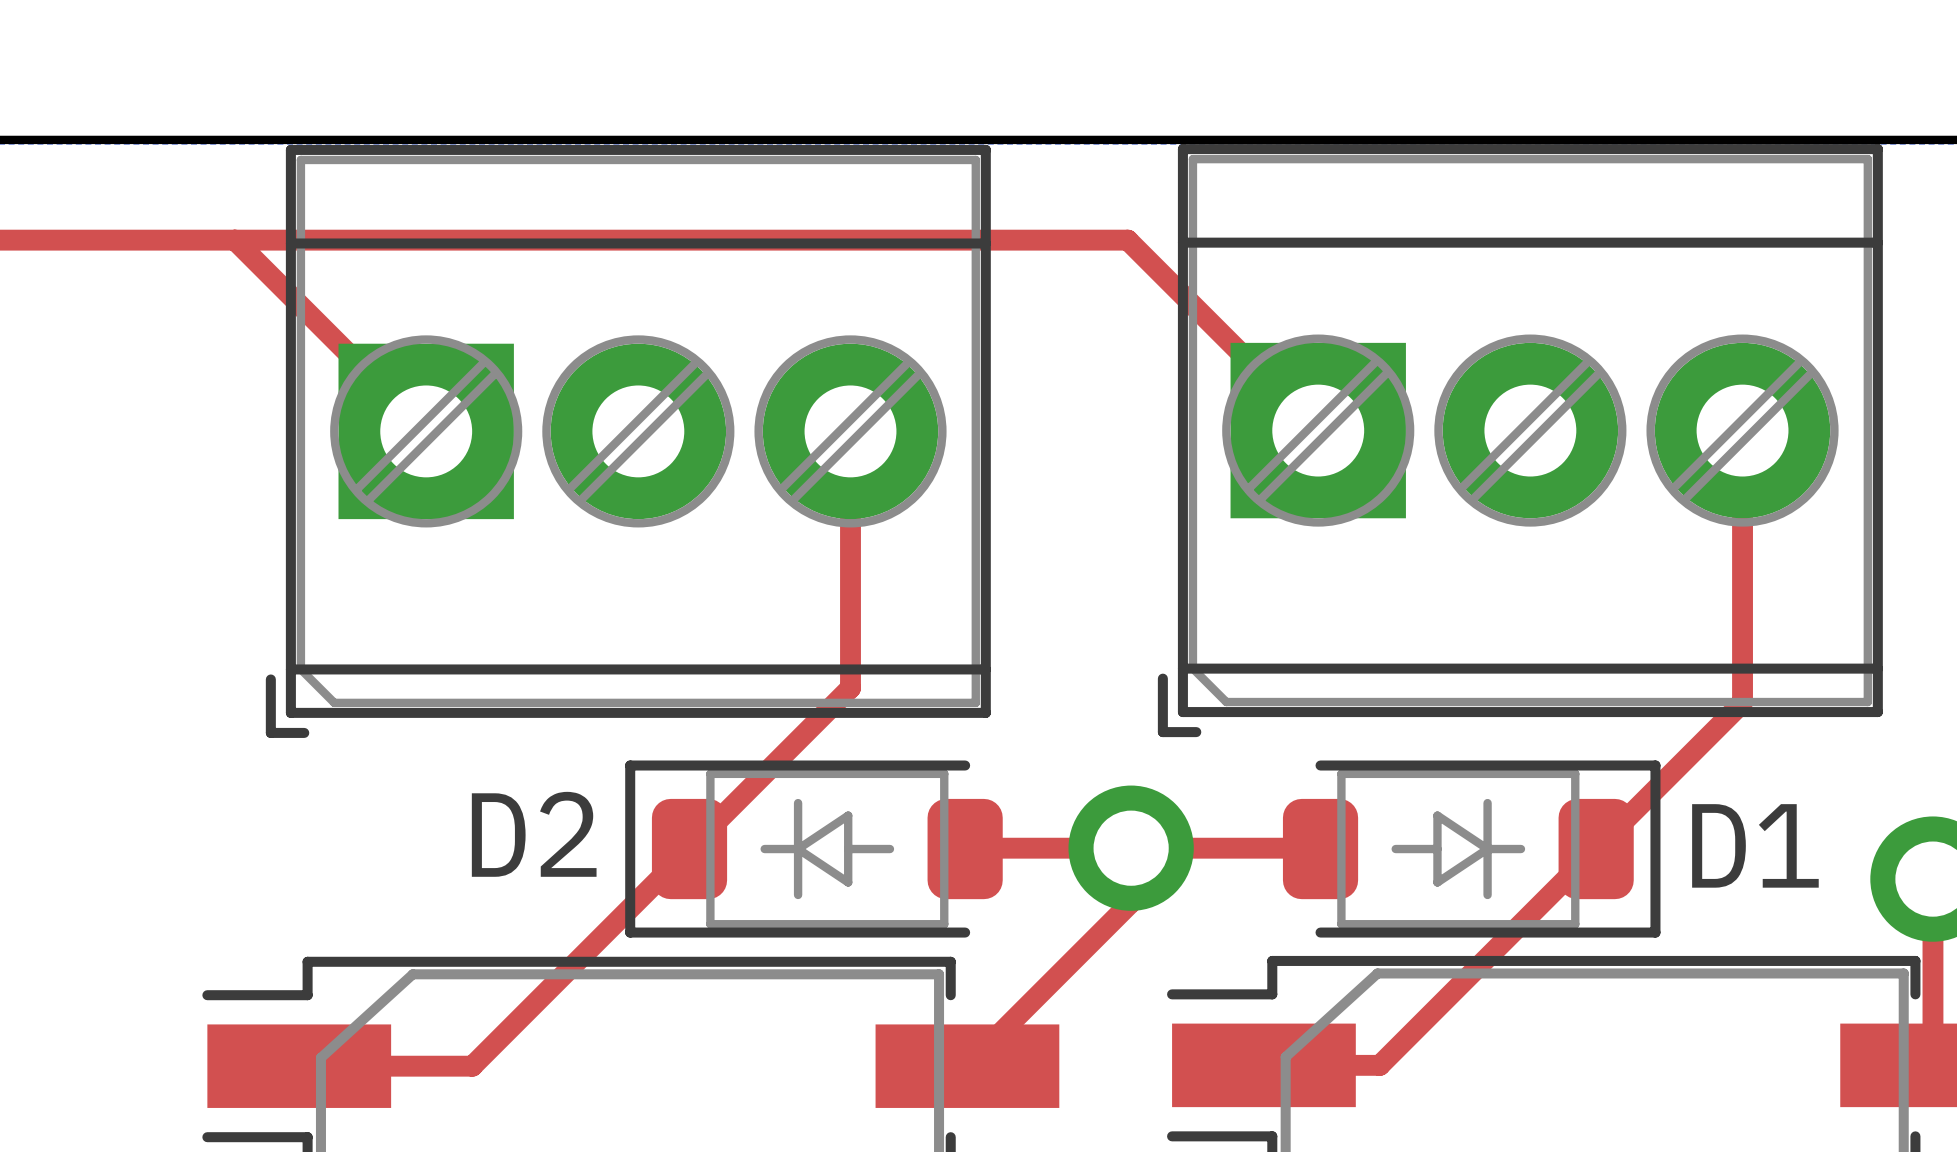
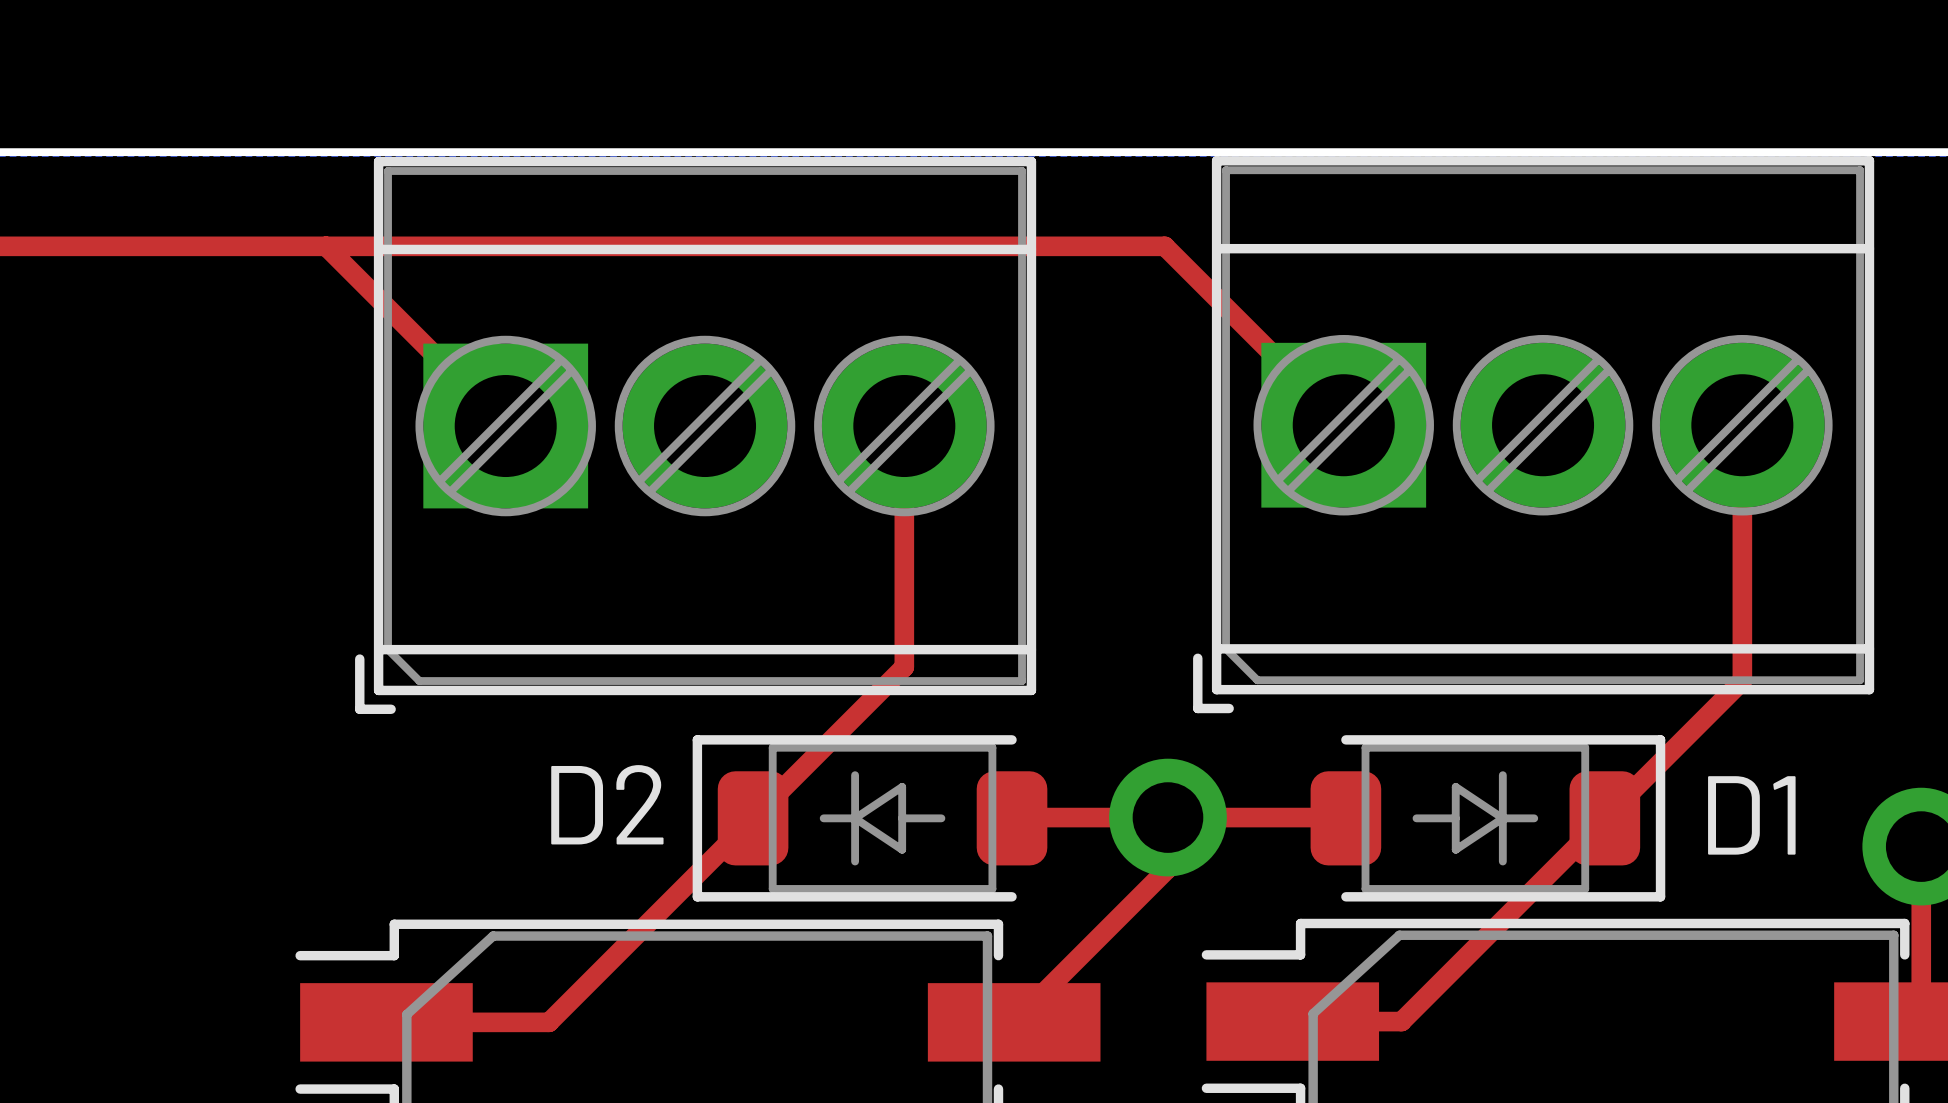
part footprint: [265, 144, 991, 738] -> [355, 156, 1037, 714]
part footprint: [1157, 144, 1883, 738] -> [1193, 156, 1875, 714]

